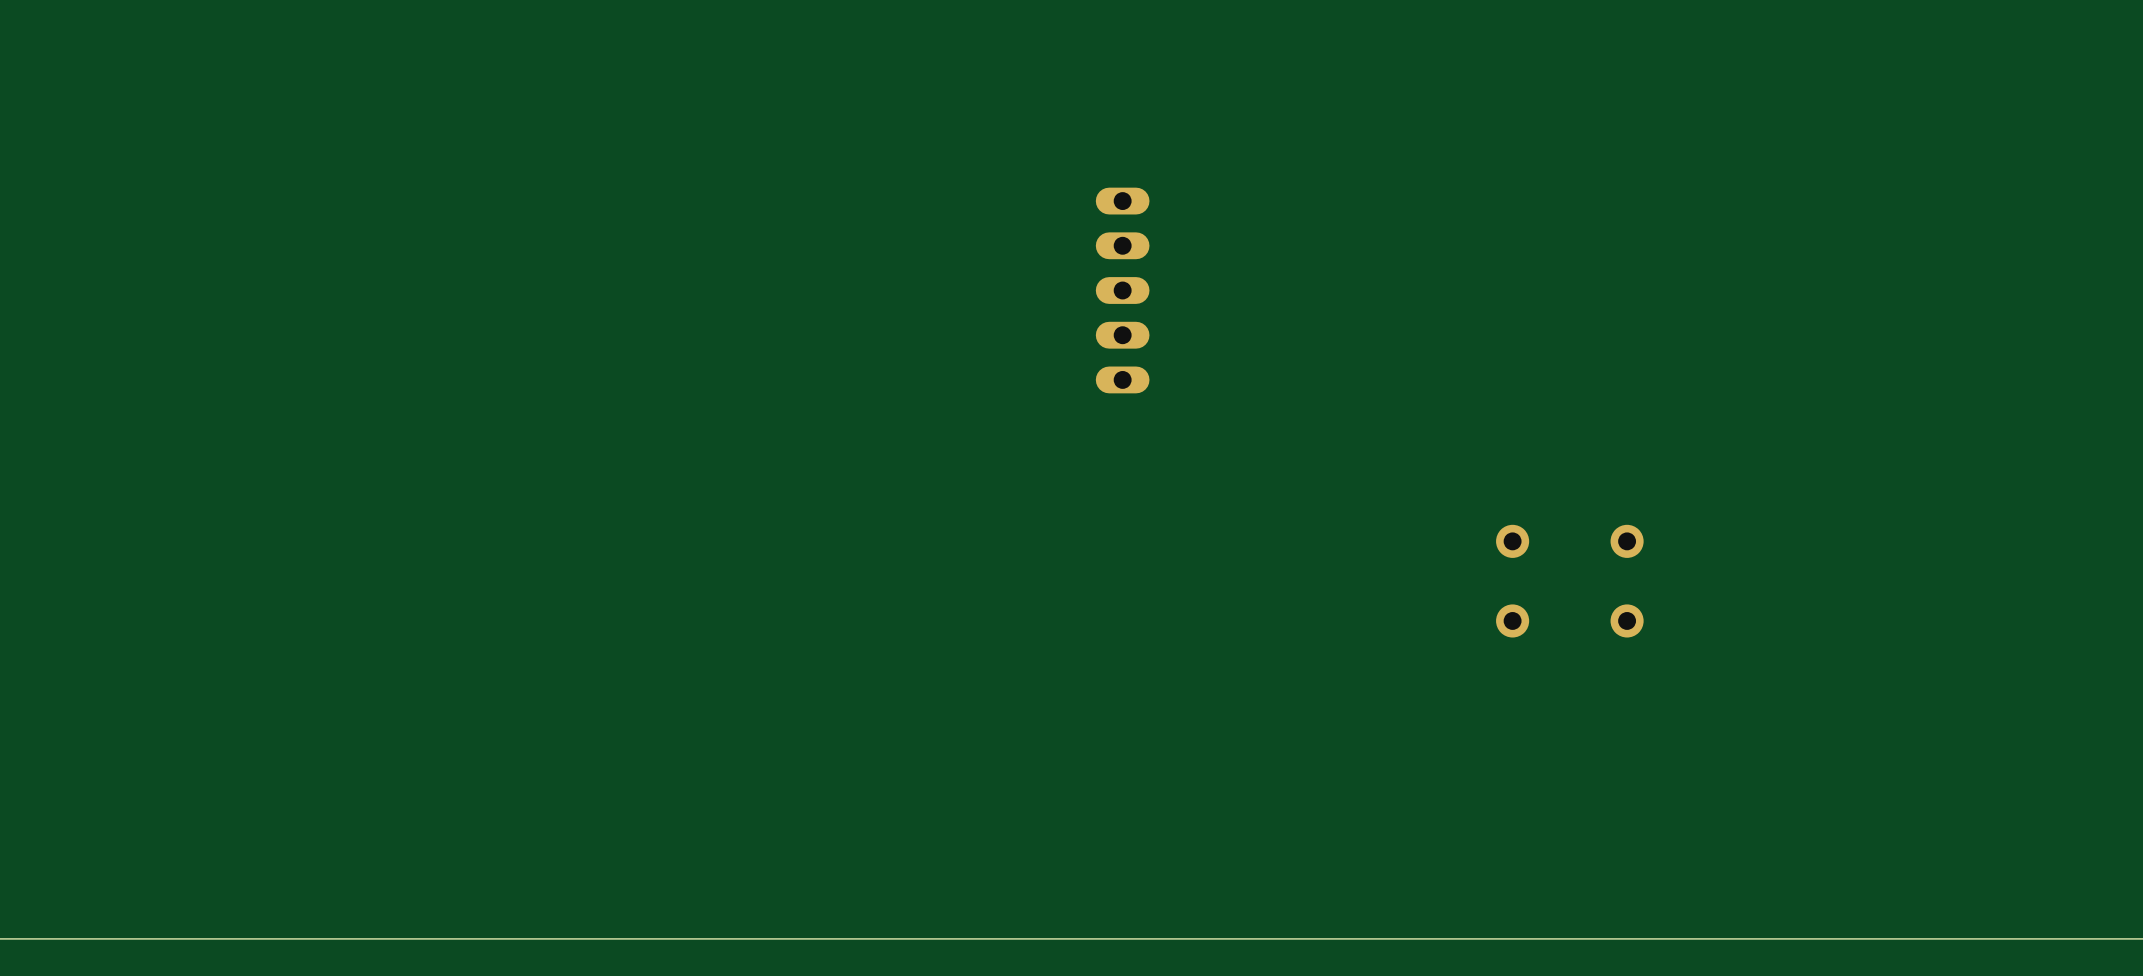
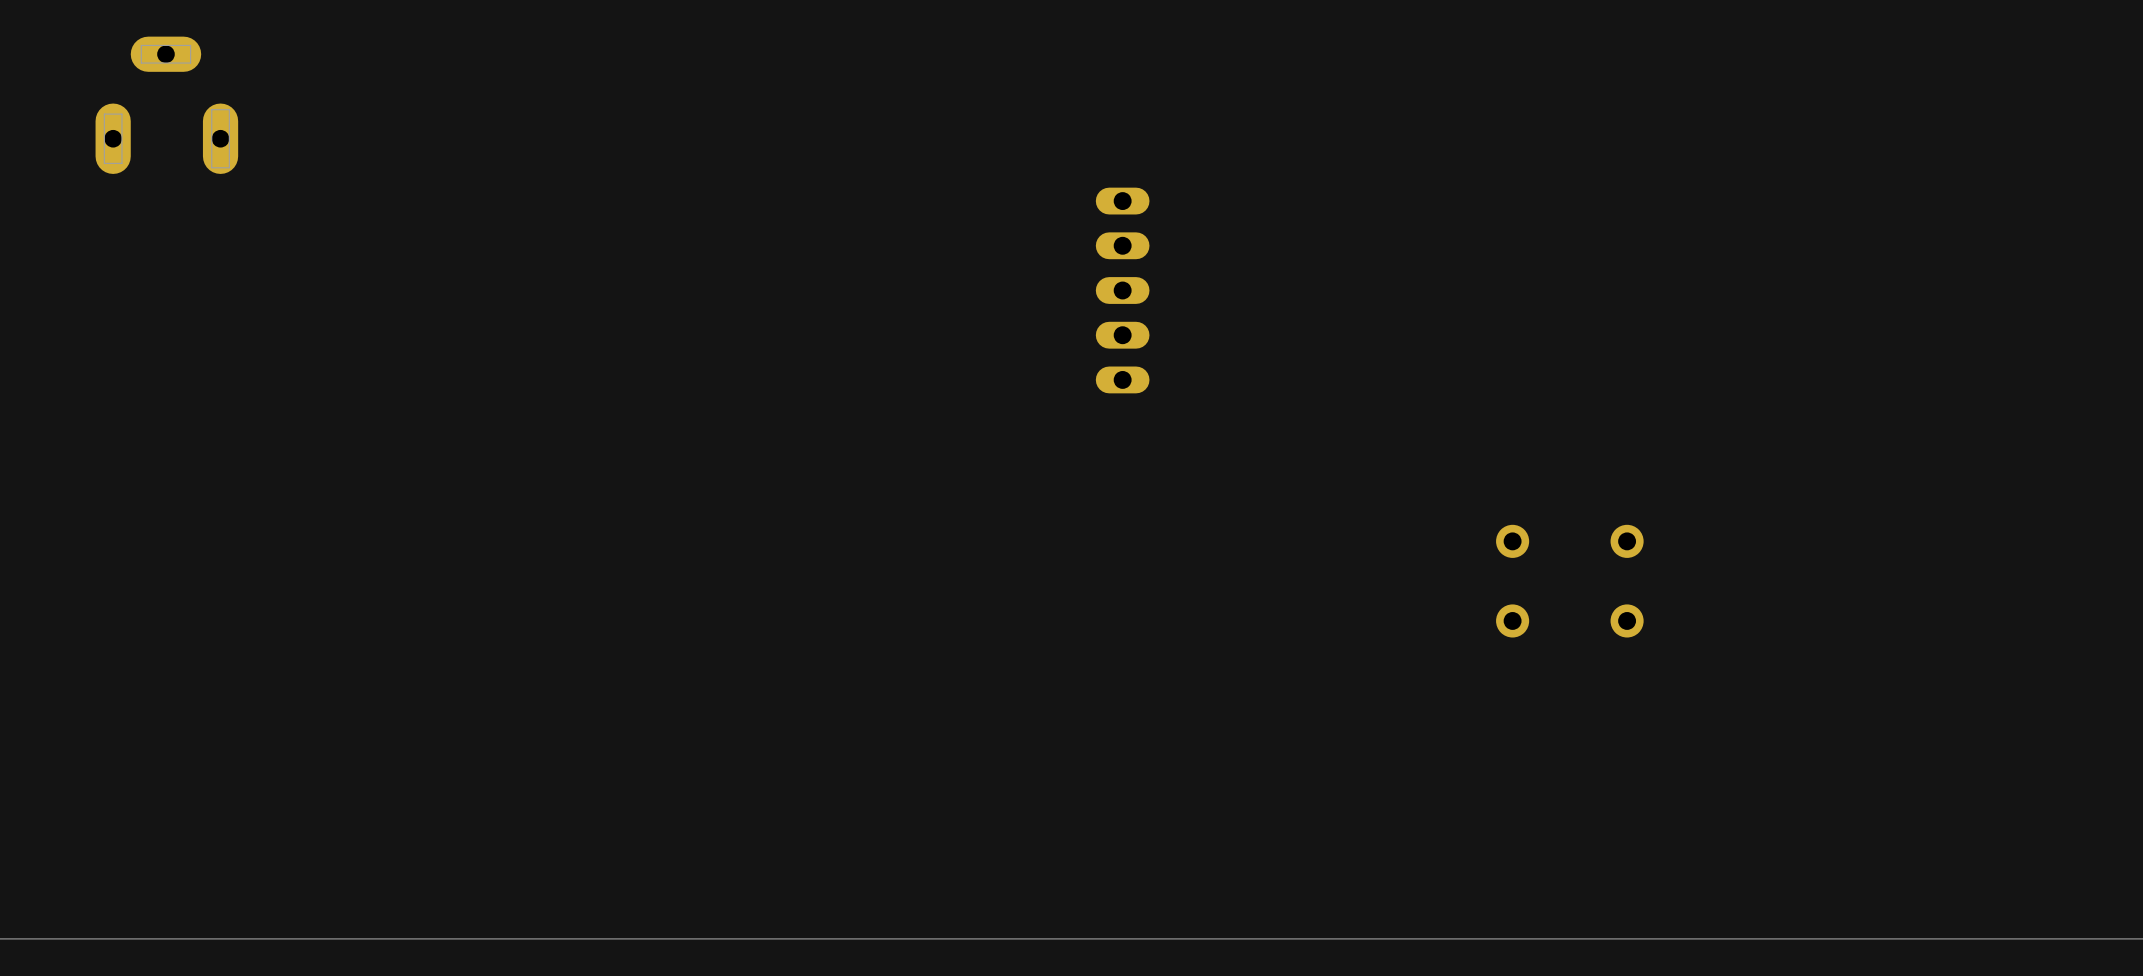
part: none -> (166, 105)

